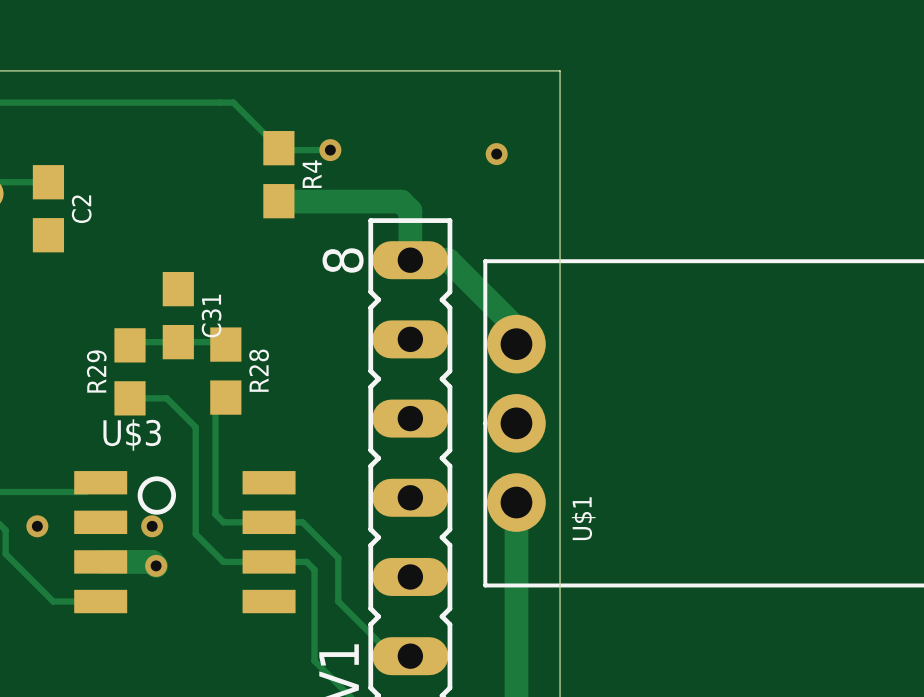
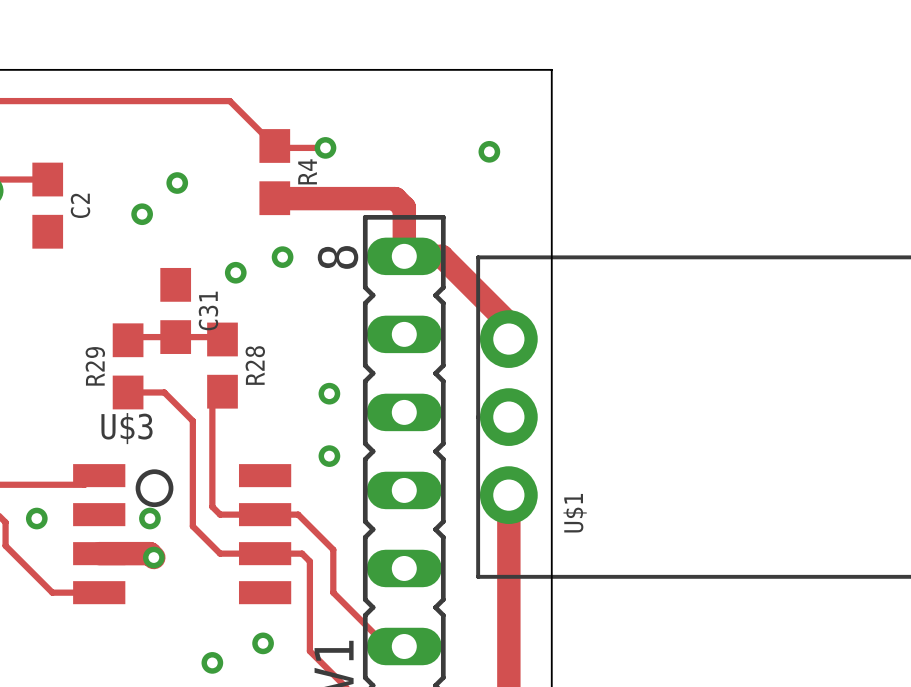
via: none -> (177, 183)
via: none -> (142, 214)
via: none -> (282, 257)
via: none -> (235, 272)
via: none -> (329, 393)
via: none -> (329, 456)
via: none -> (263, 643)
via: none -> (212, 662)

